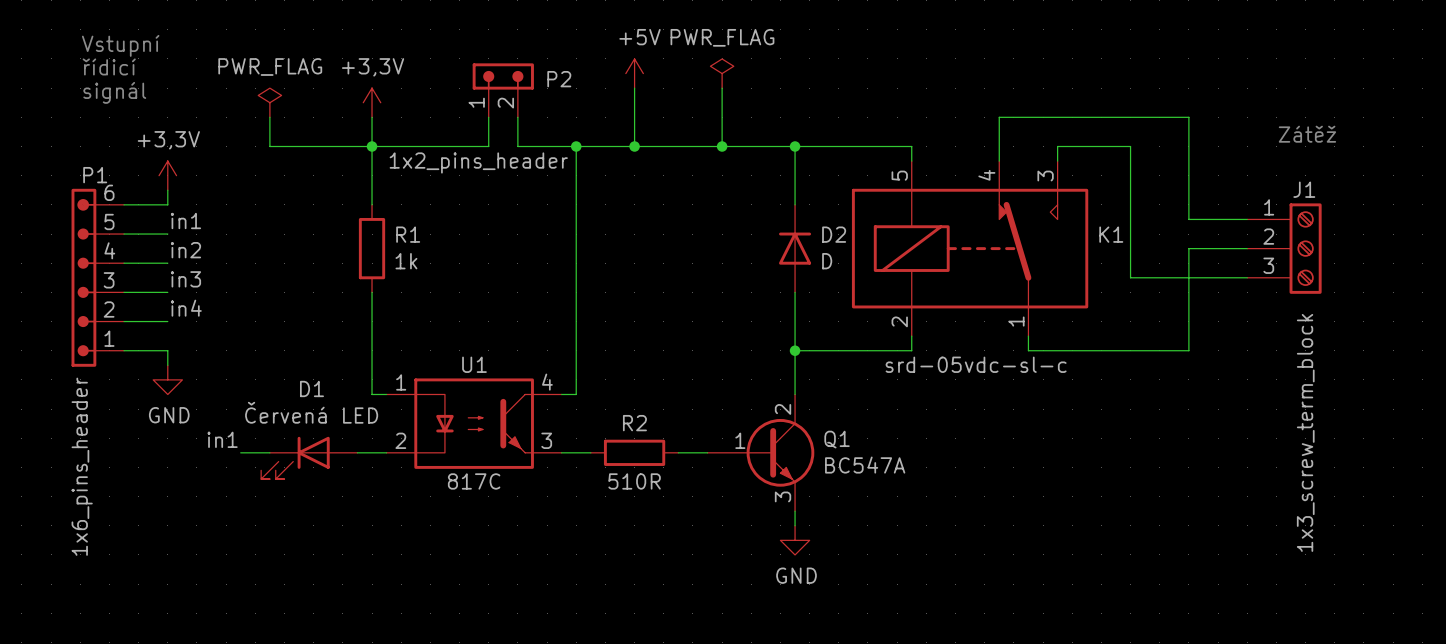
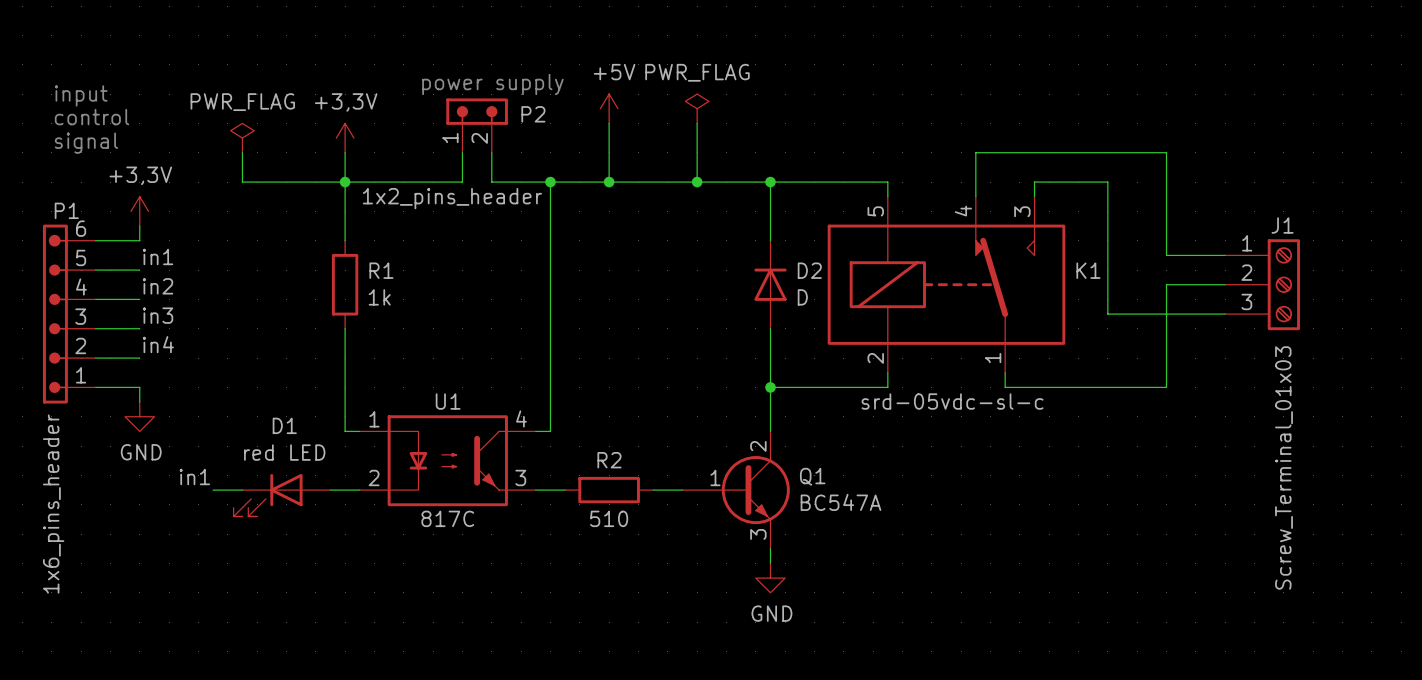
text: Vstupní (120, 45) -> none
text: none -> power supply (492, 84)
text: none -> input (81, 95)
text: řídicí (109, 66) -> none
text: none -> control (92, 117)
text: signál (114, 92) -> signal (86, 143)
text: Zátěž (1307, 134) -> none
D1 value: Červená LED (311, 412) -> red LED (284, 452)
J1 value: 1x3_screw_term_block (1305, 432) -> Screw_Terminal_01x03 (1284, 467)
R2 value: 510R (634, 481) -> 510 (609, 518)

